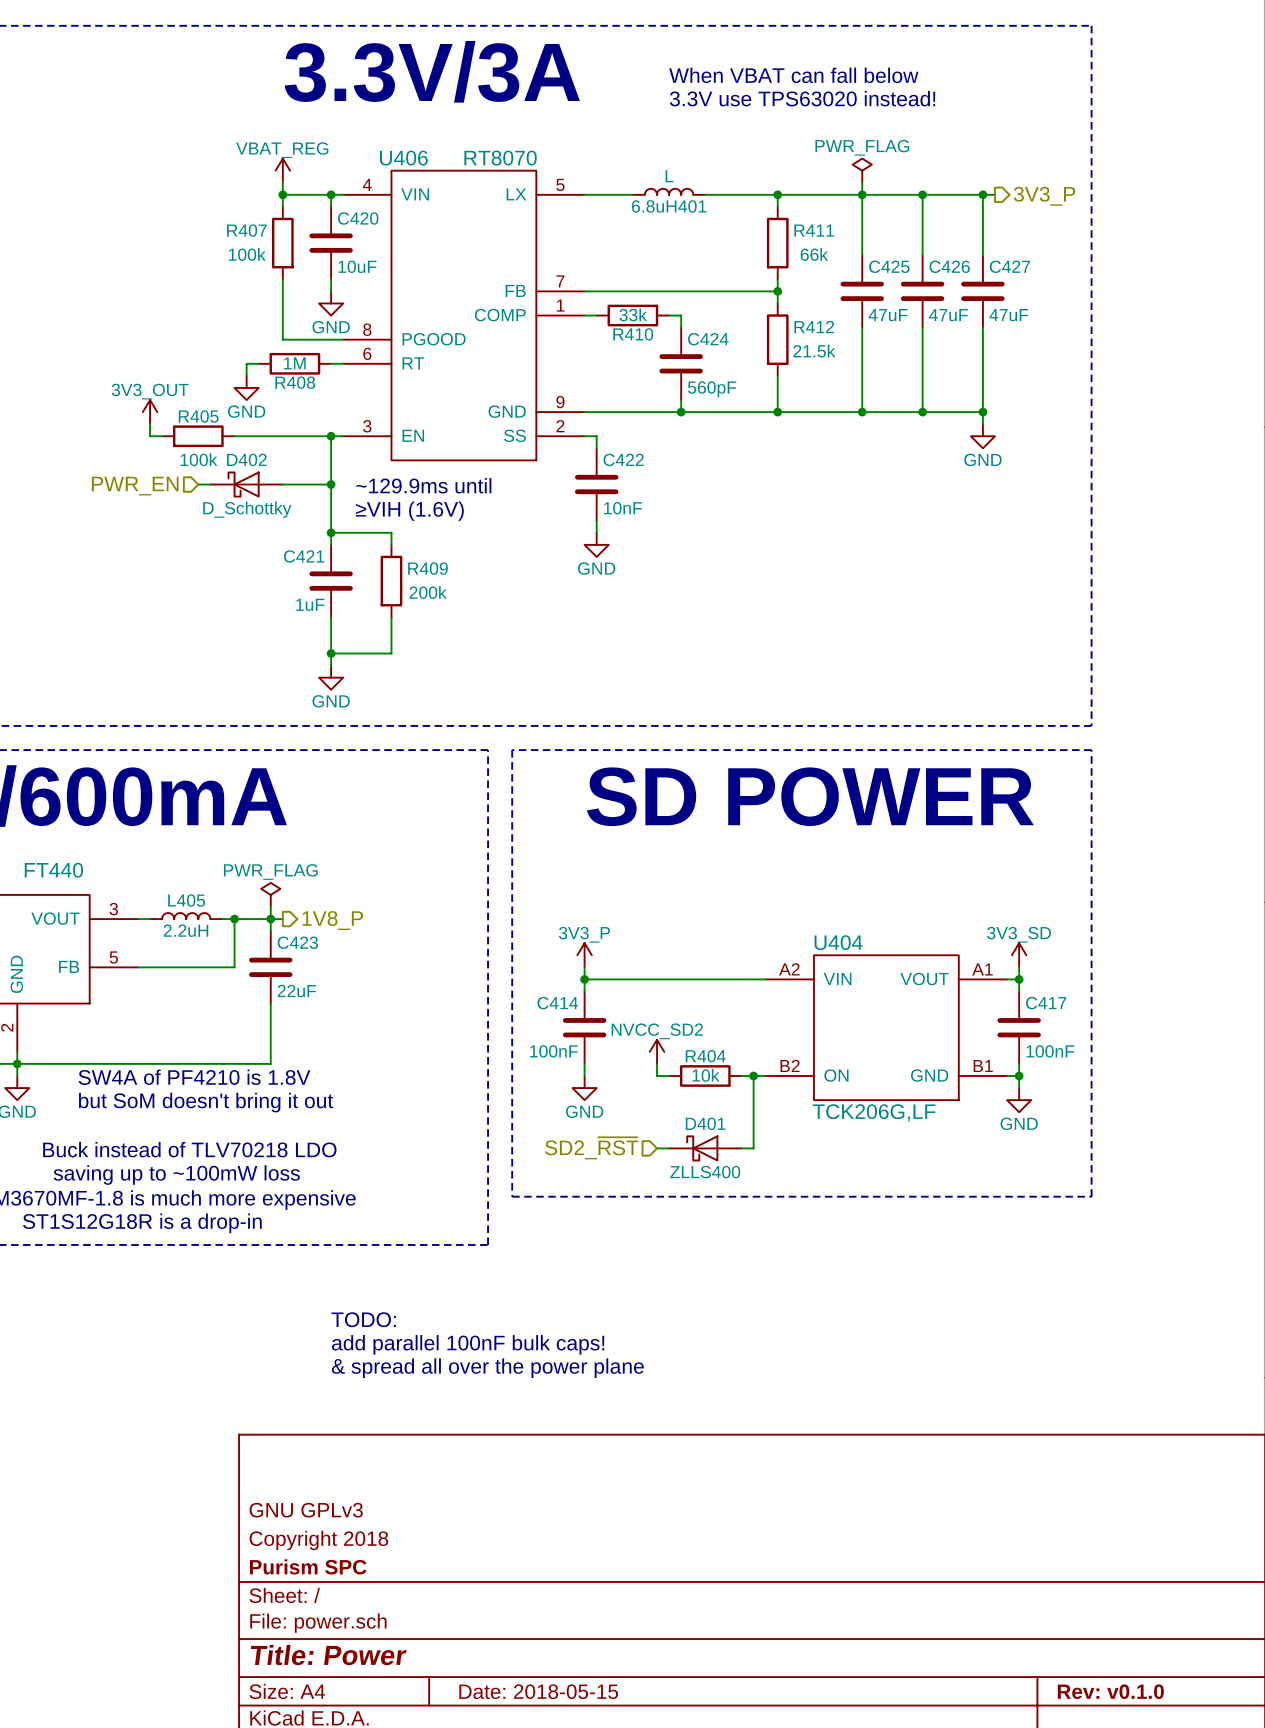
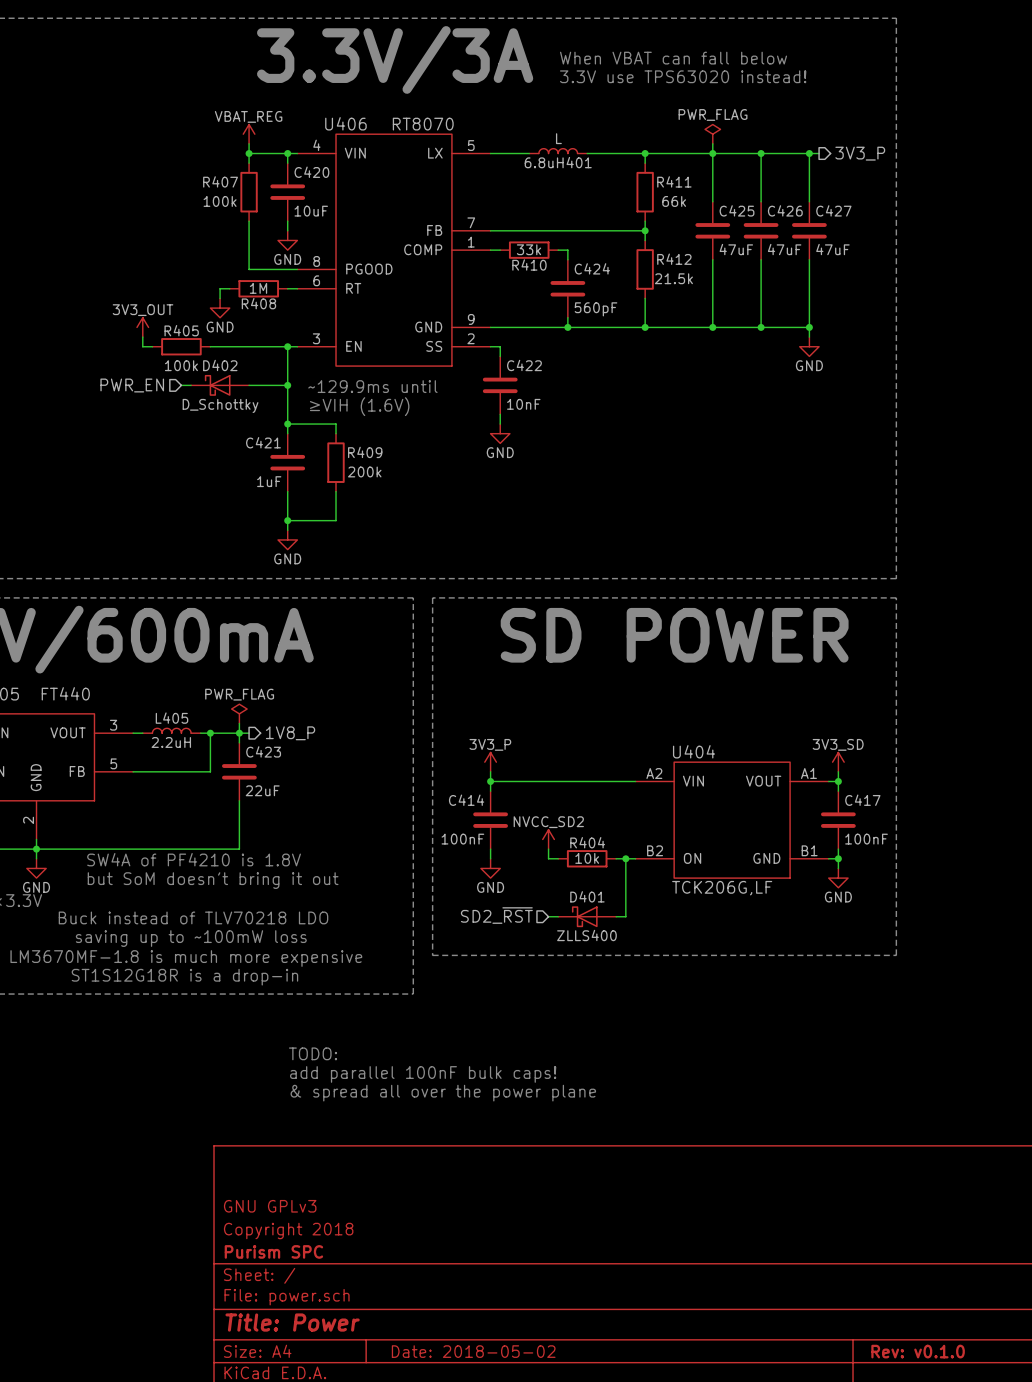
title block: Date: 2018-05-15 (538, 1691) -> Date: 2018-05-02 (473, 1351)

